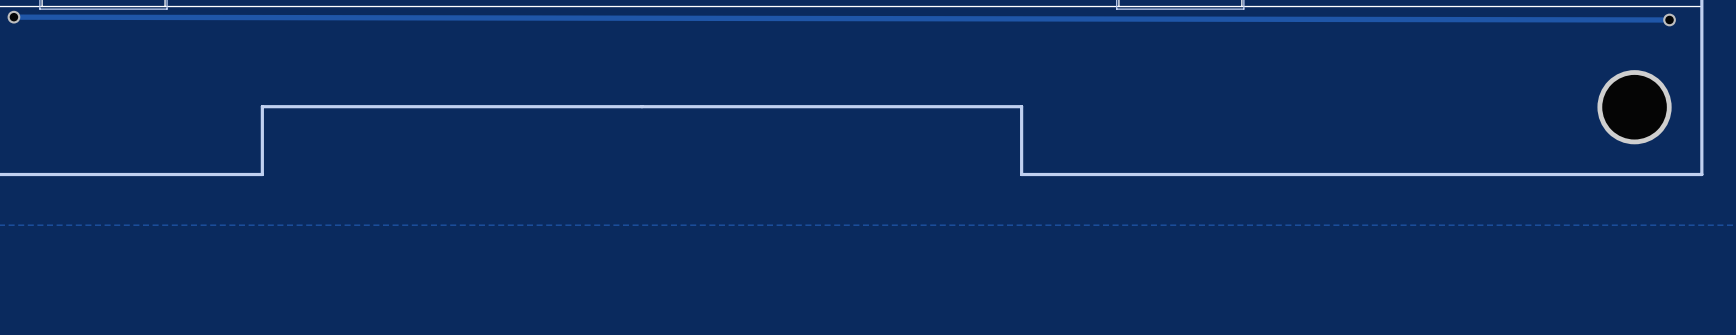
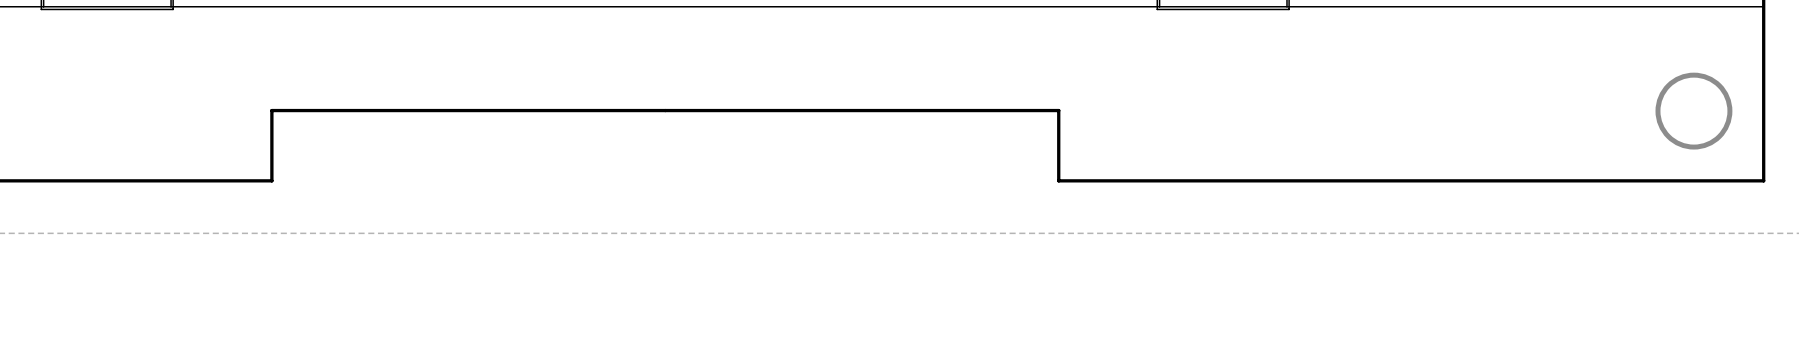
track: (13, 17) (1669, 19) -> none
via: (13, 17) -> none
via: (1669, 19) -> none

